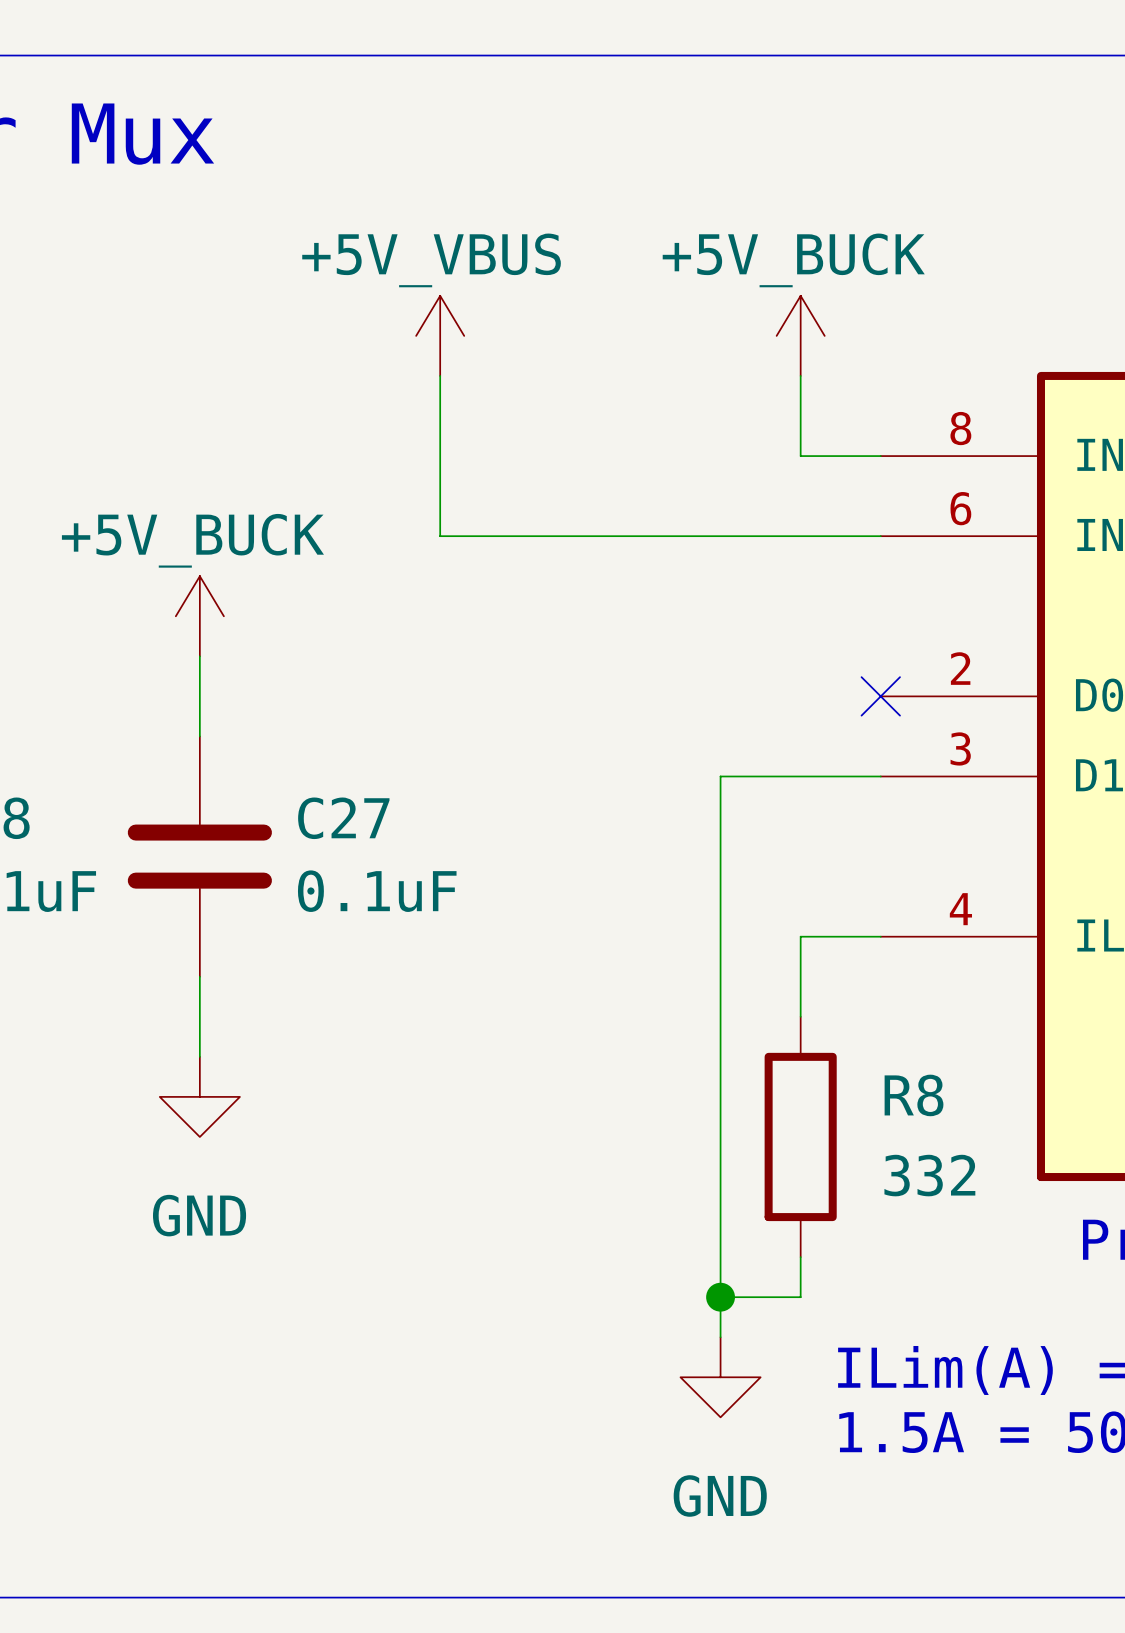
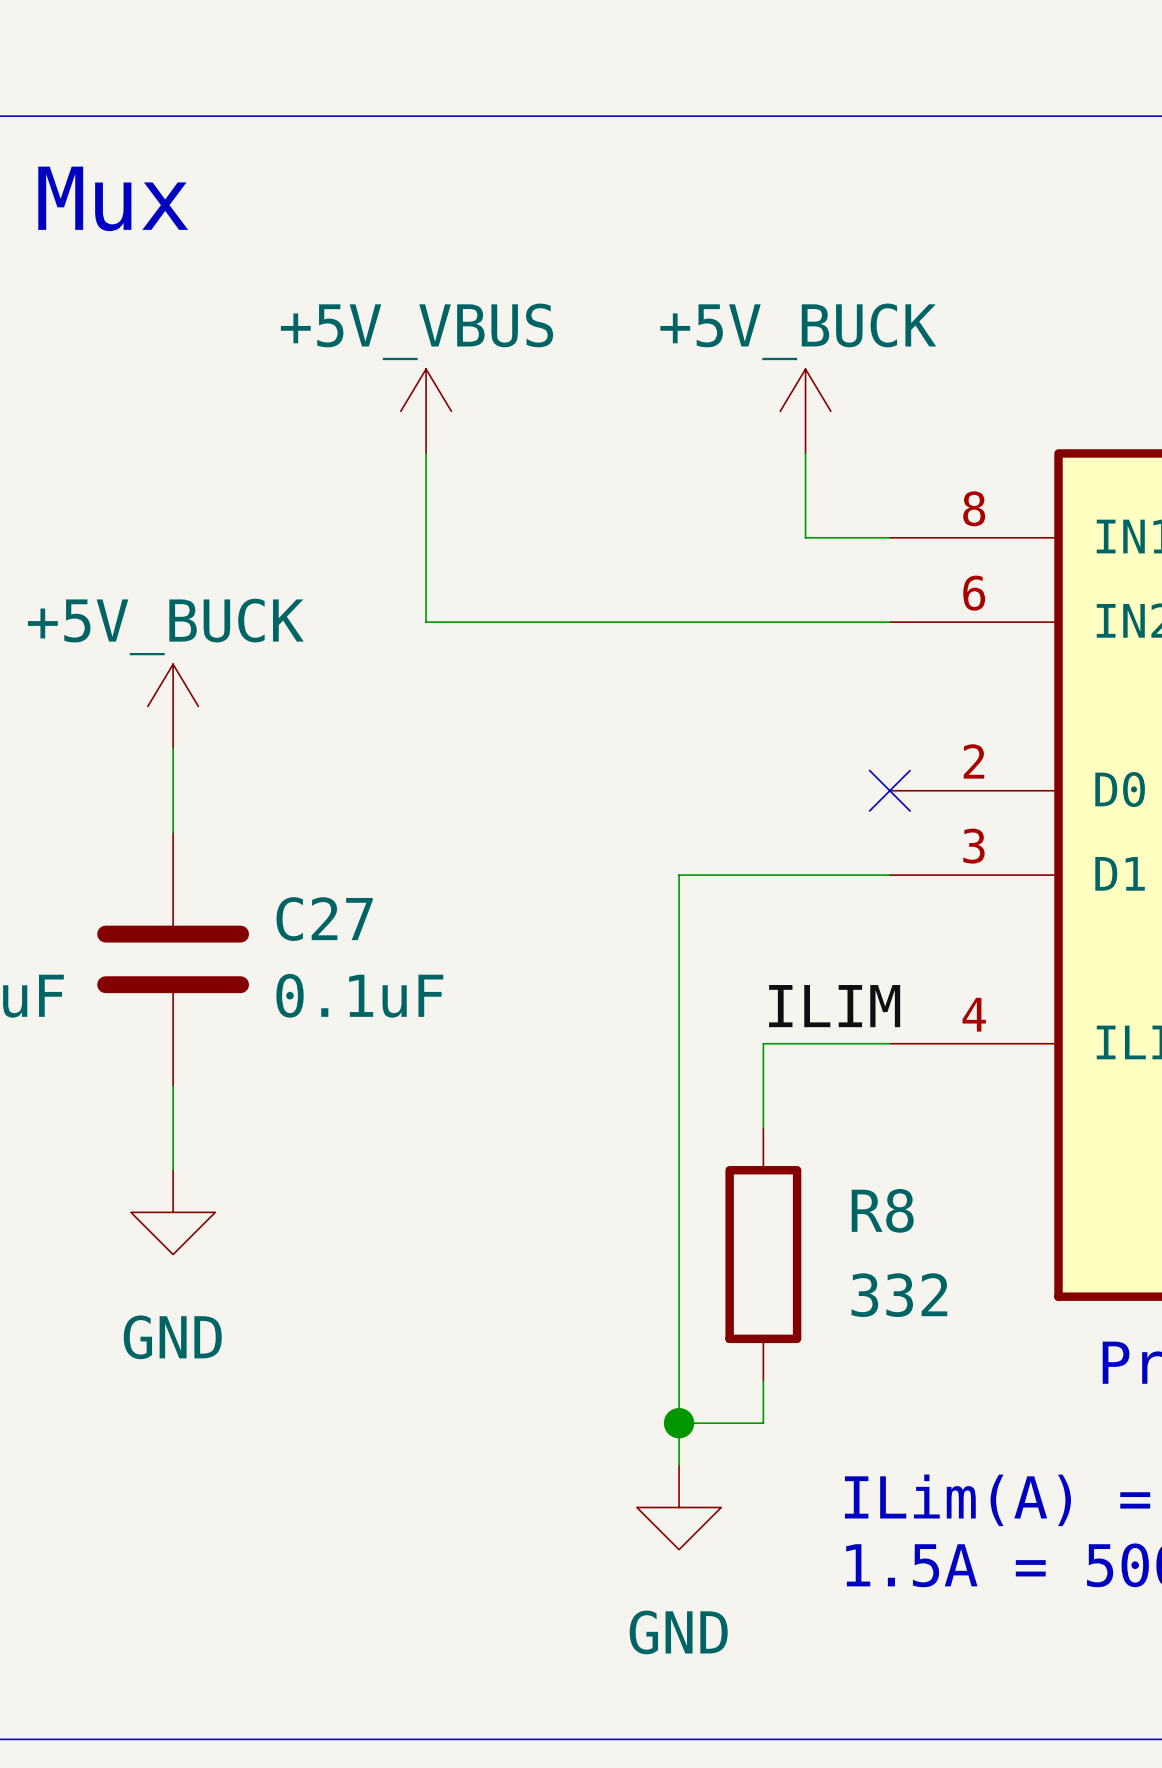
wire: (720, 776) (720, 1337) -> (721, 875) (679, 875) (679, 1465)
label: none -> ILIM (834, 1006)
wire: (800, 936) (800, 1016) -> (805, 1043) (763, 1043) (763, 1128)
R8 position: (800, 1136) -> (763, 1254)
wire: (800, 1257) (800, 1297) (760, 1297) -> (763, 1381) (763, 1423)
wire: none -> (679, 1423) (721, 1423)
junction position: (720, 1297) -> (679, 1423)
power symbol position: GND (720, 1377) -> GND (679, 1507)

